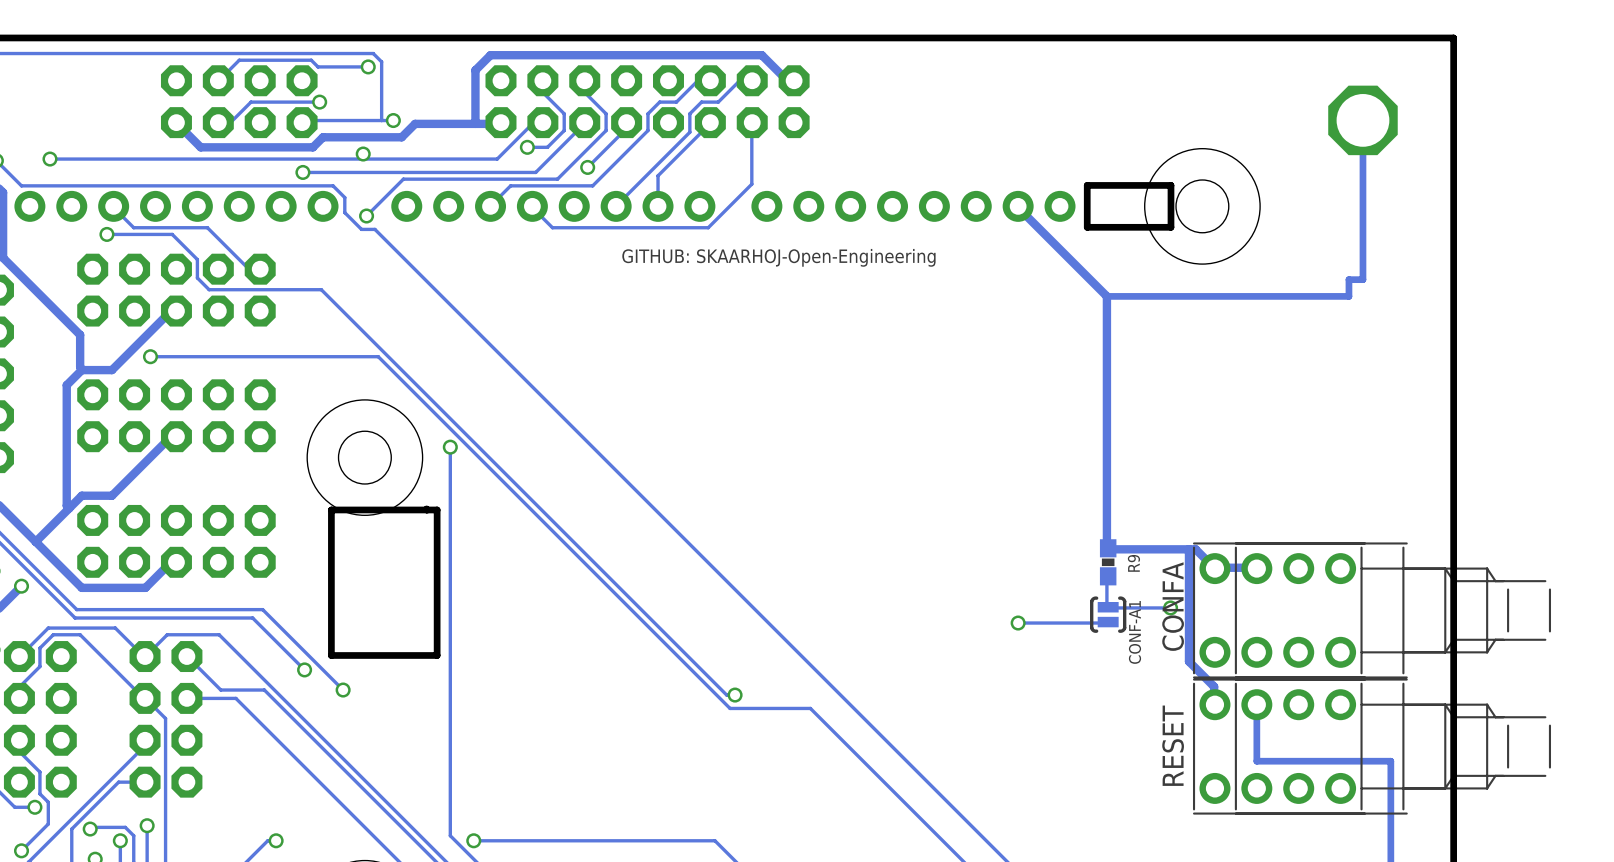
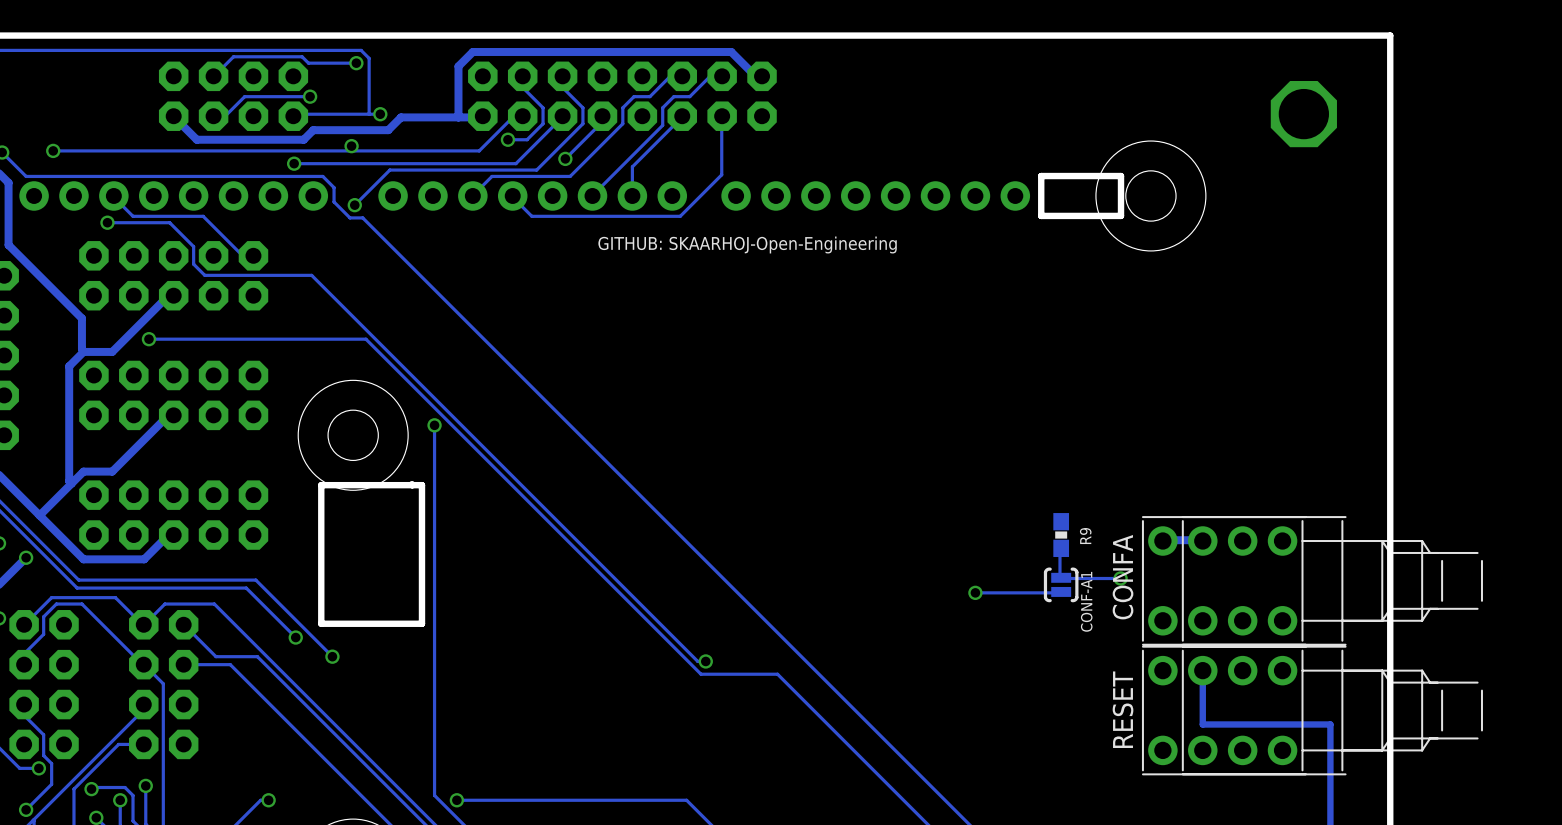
track: (1362, 120) (1362, 279) (1348, 279) (1348, 296) (1106, 296) -> none
track: (1018, 206) (1106, 296) -> none
track: (1106, 296) (1108, 548) (1195, 549) (1214, 568) -> none
track: (1189, 549) (1189, 661) (1214, 686) (1214, 704) -> none

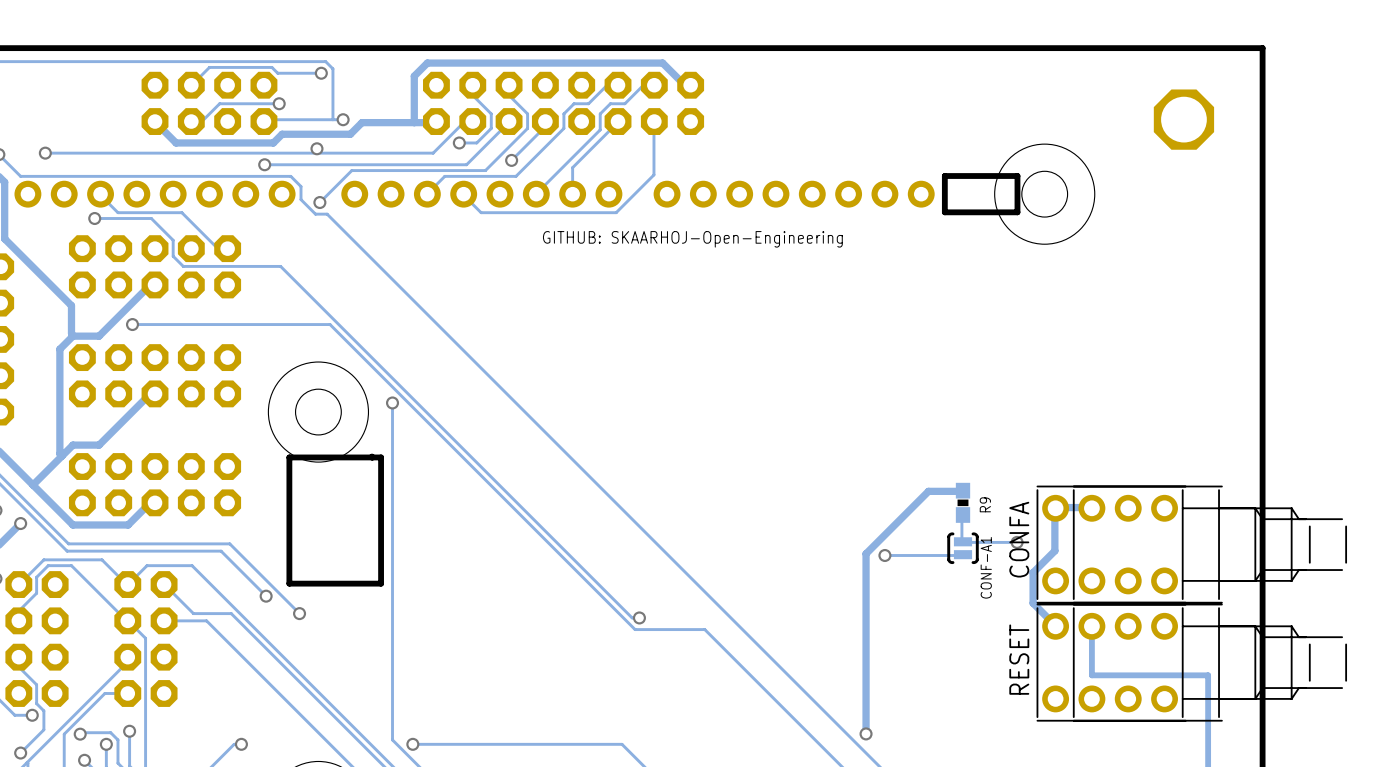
track: none -> (963, 490) (928, 491) (866, 553) (866, 733)
track: none -> (1055, 508) (1054, 550) (1033, 572) (1033, 603) (1055, 626)
via: none -> (866, 733)

